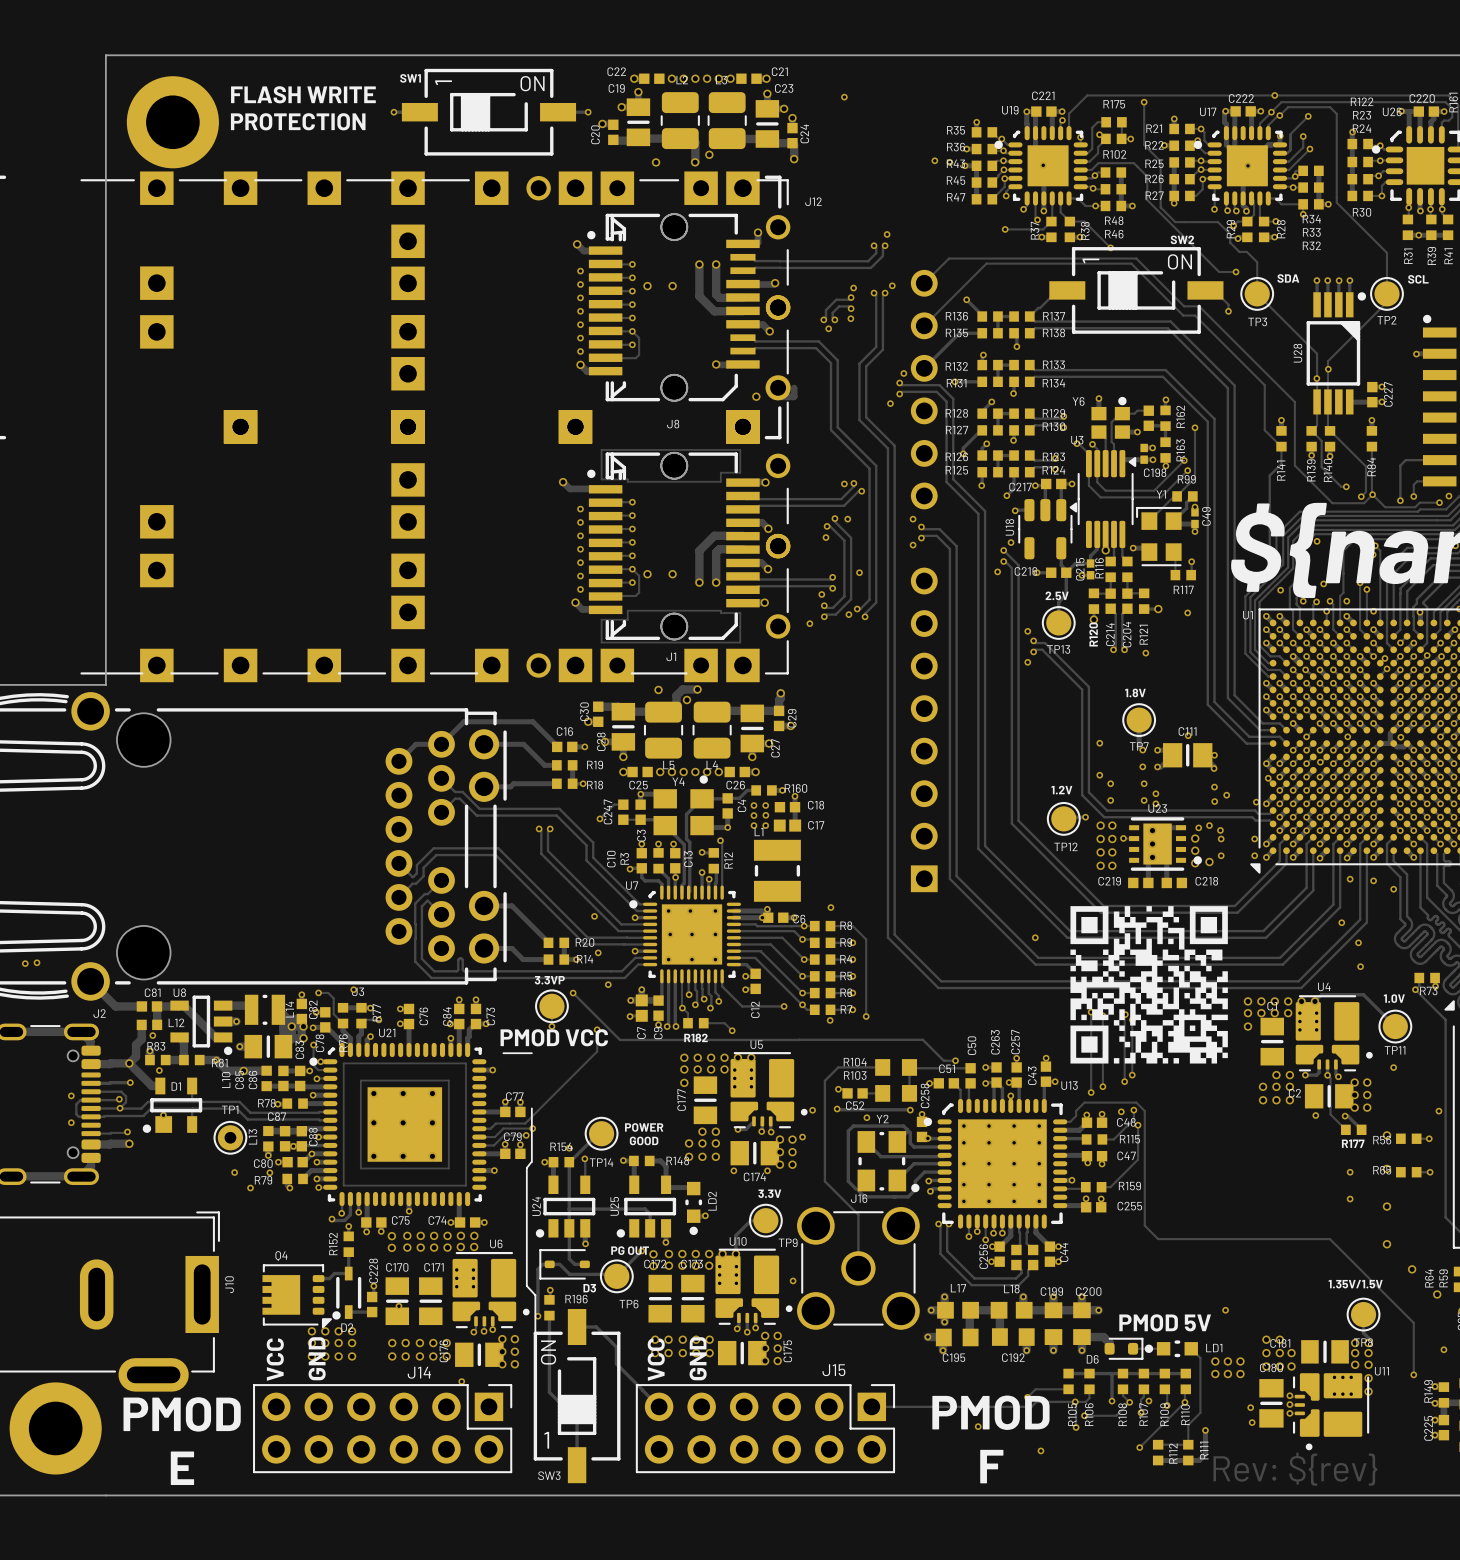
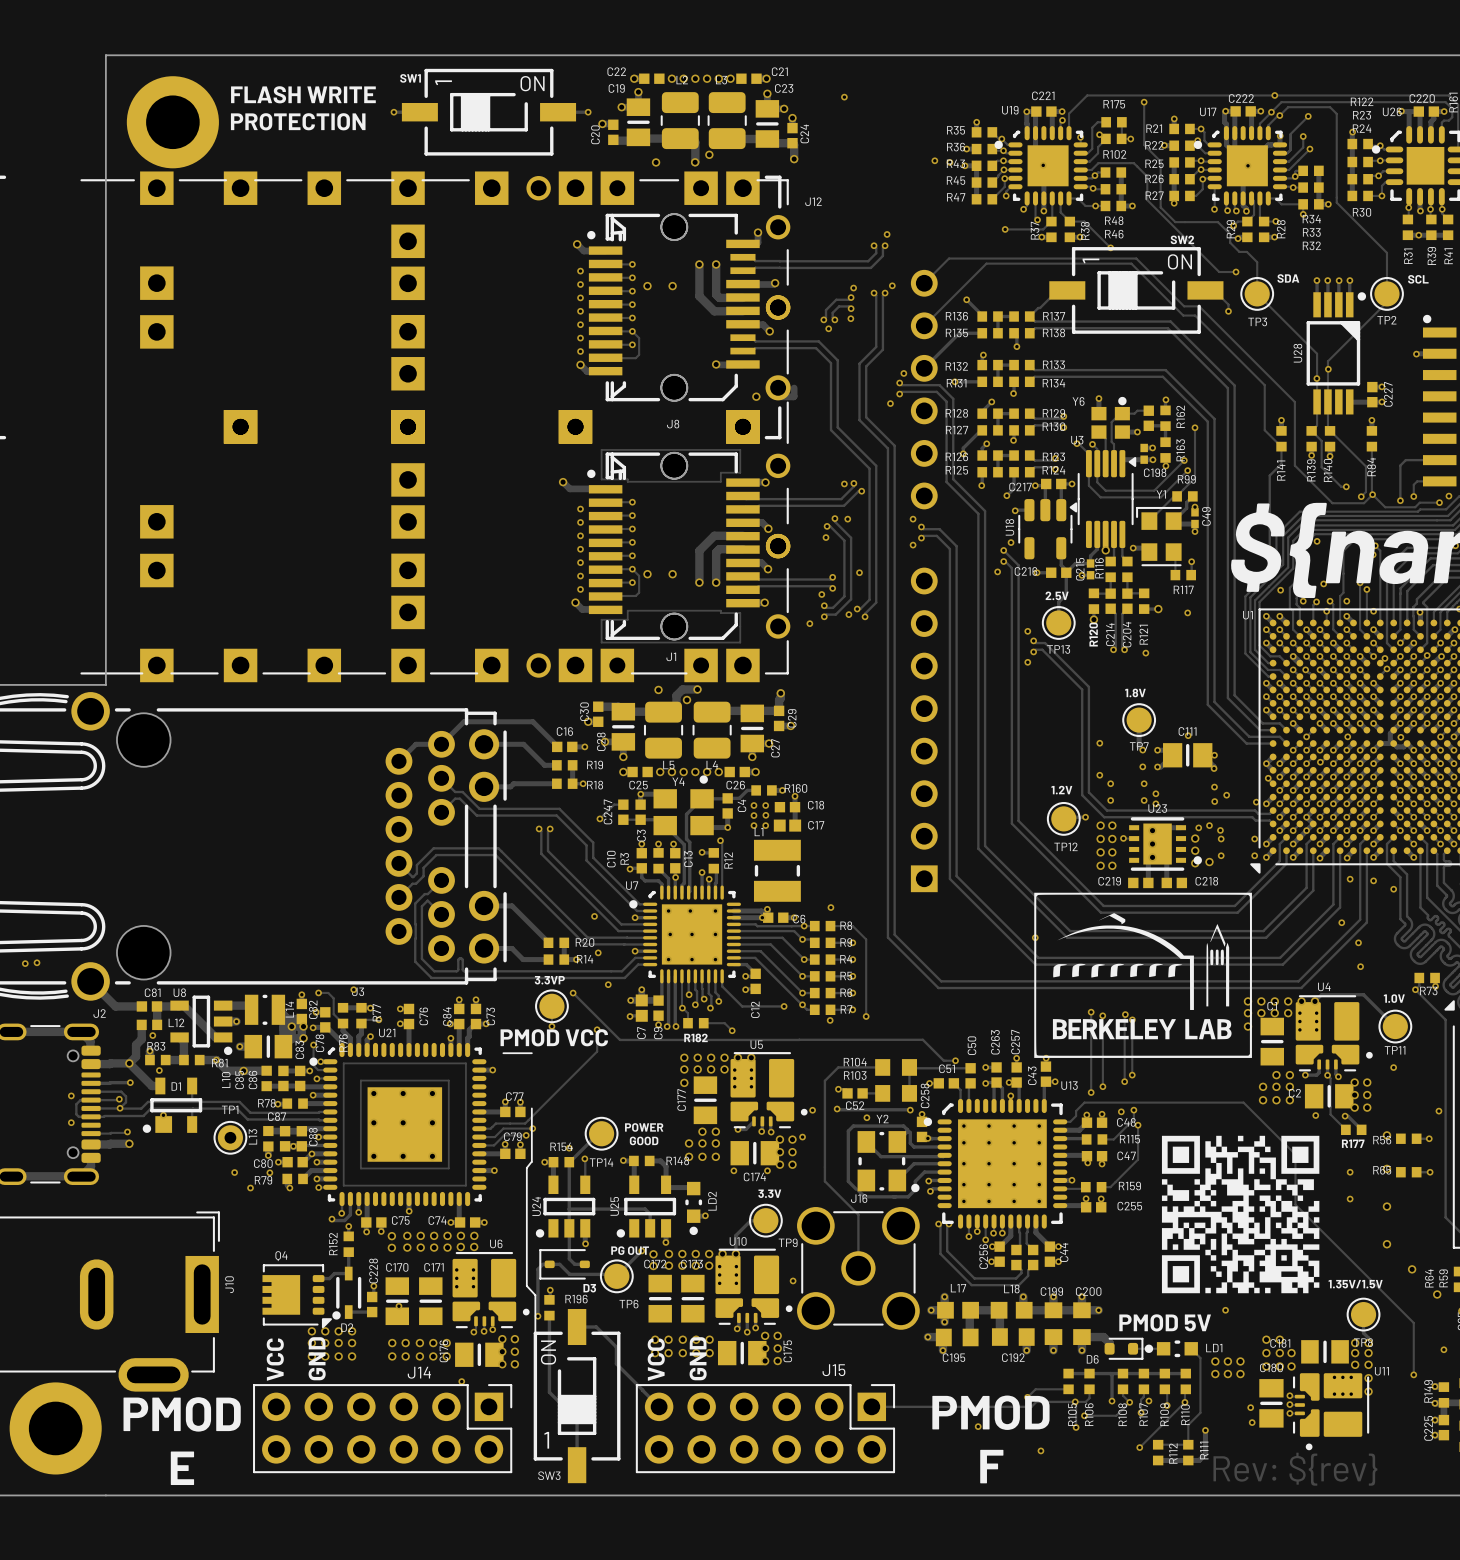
drawing: [1070, 906, 1228, 1064] -> none
drawing shape: [1141, 971, 1147, 977] -> [1034, 892, 1252, 1058]
track: (1136, 1102) (1144, 1110) (1144, 1225) (1158, 1239) (1329, 1239) -> (1136, 1102) (1243, 1102) (1295, 1154) (1295, 1204) (1329, 1239)
drawing: none -> [1161, 1135, 1320, 1294]

